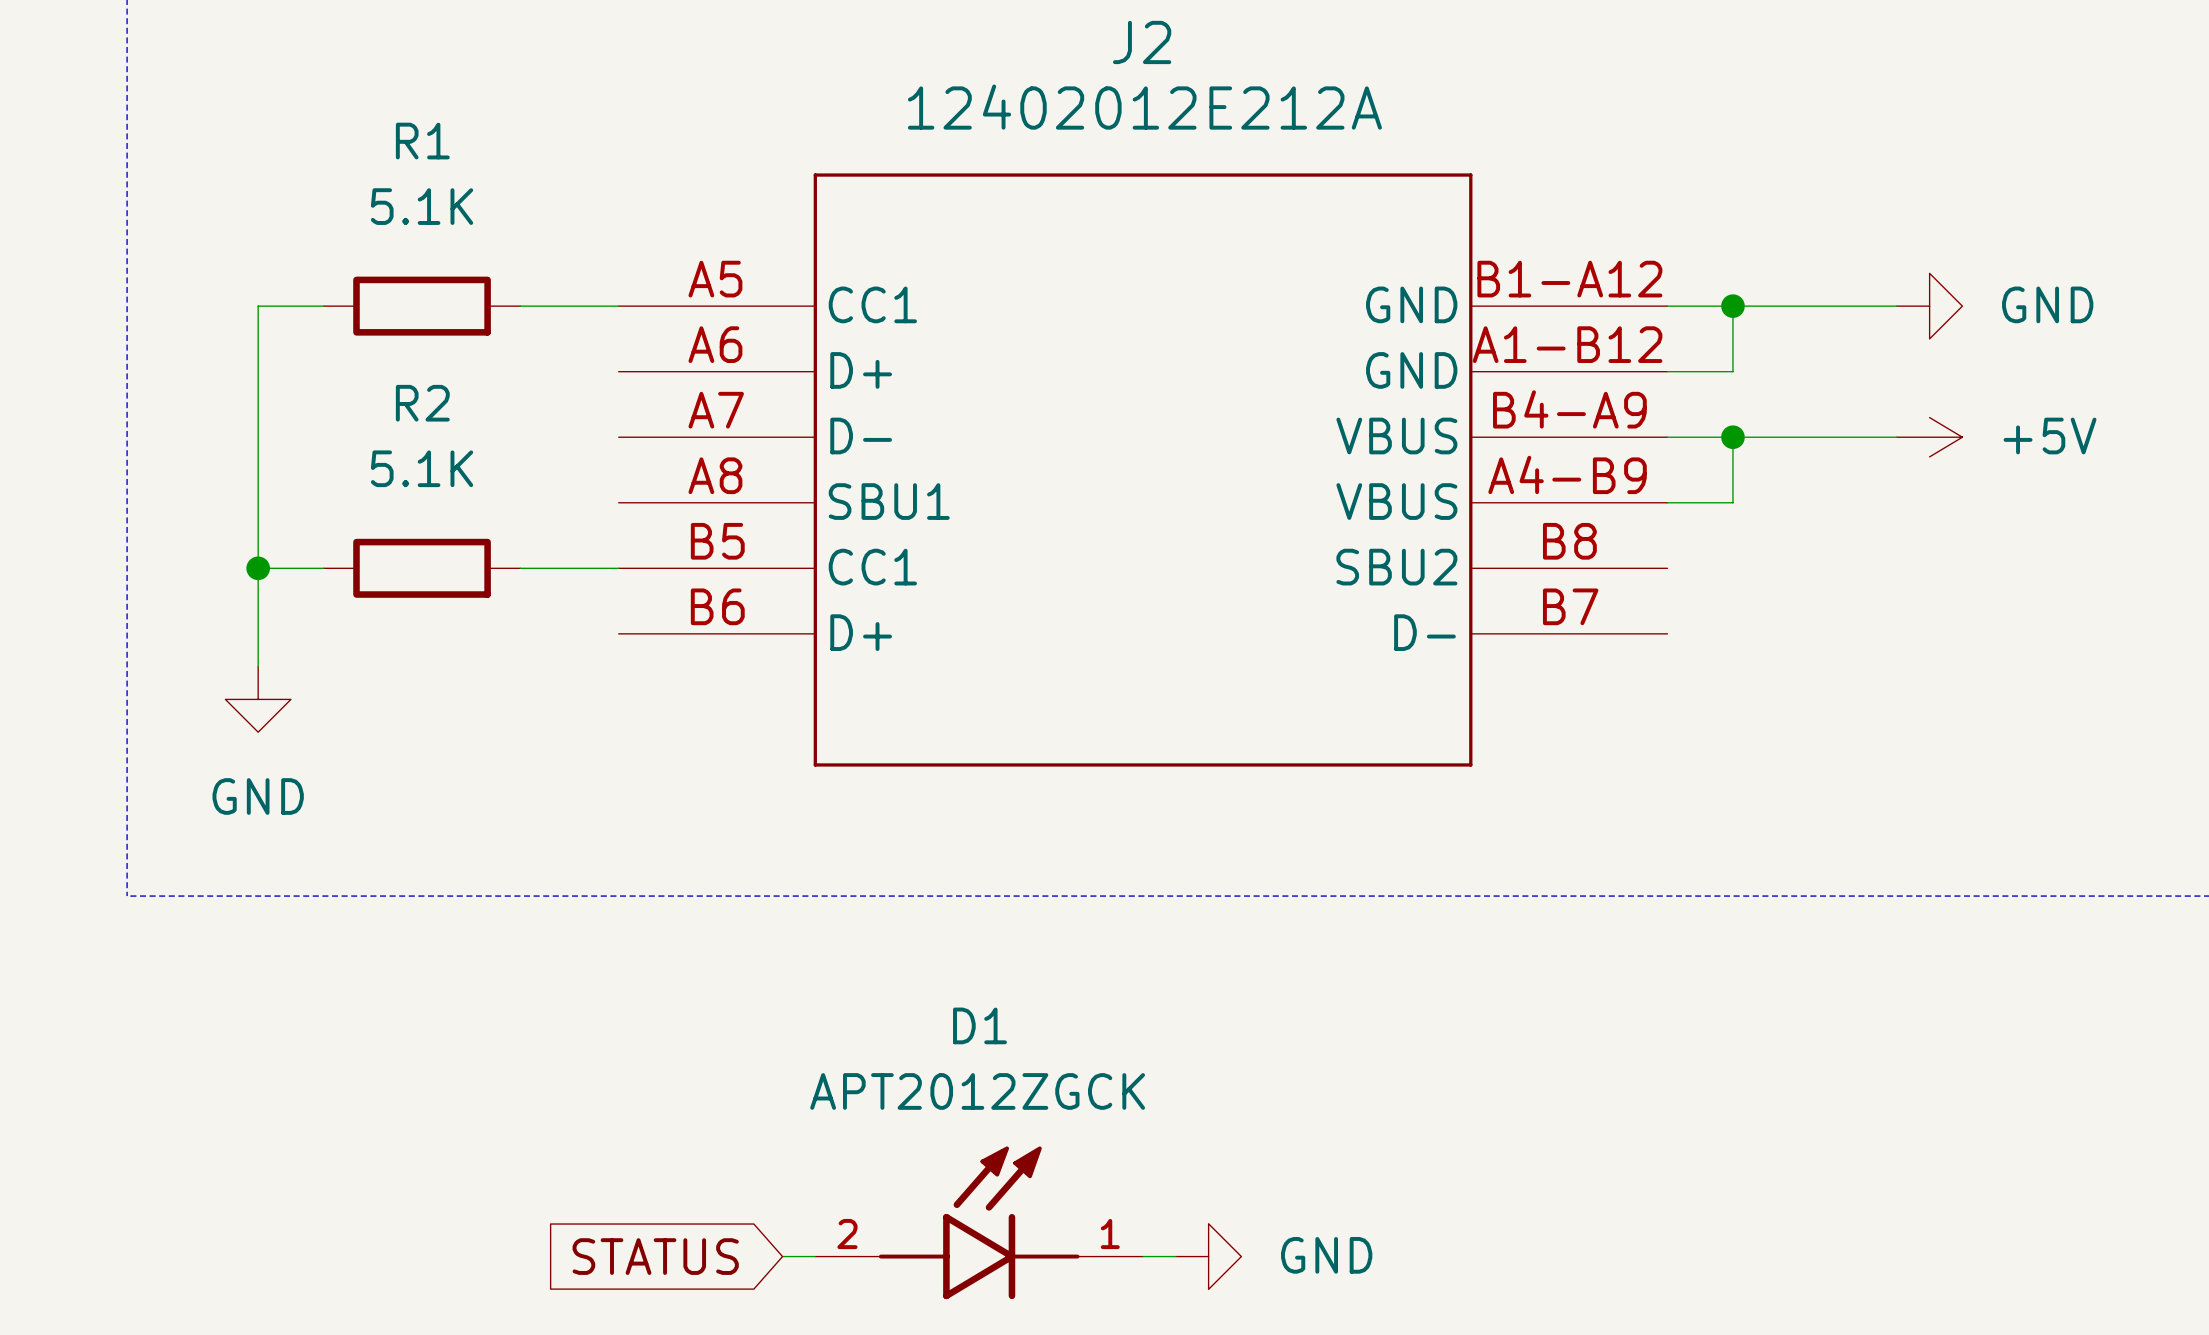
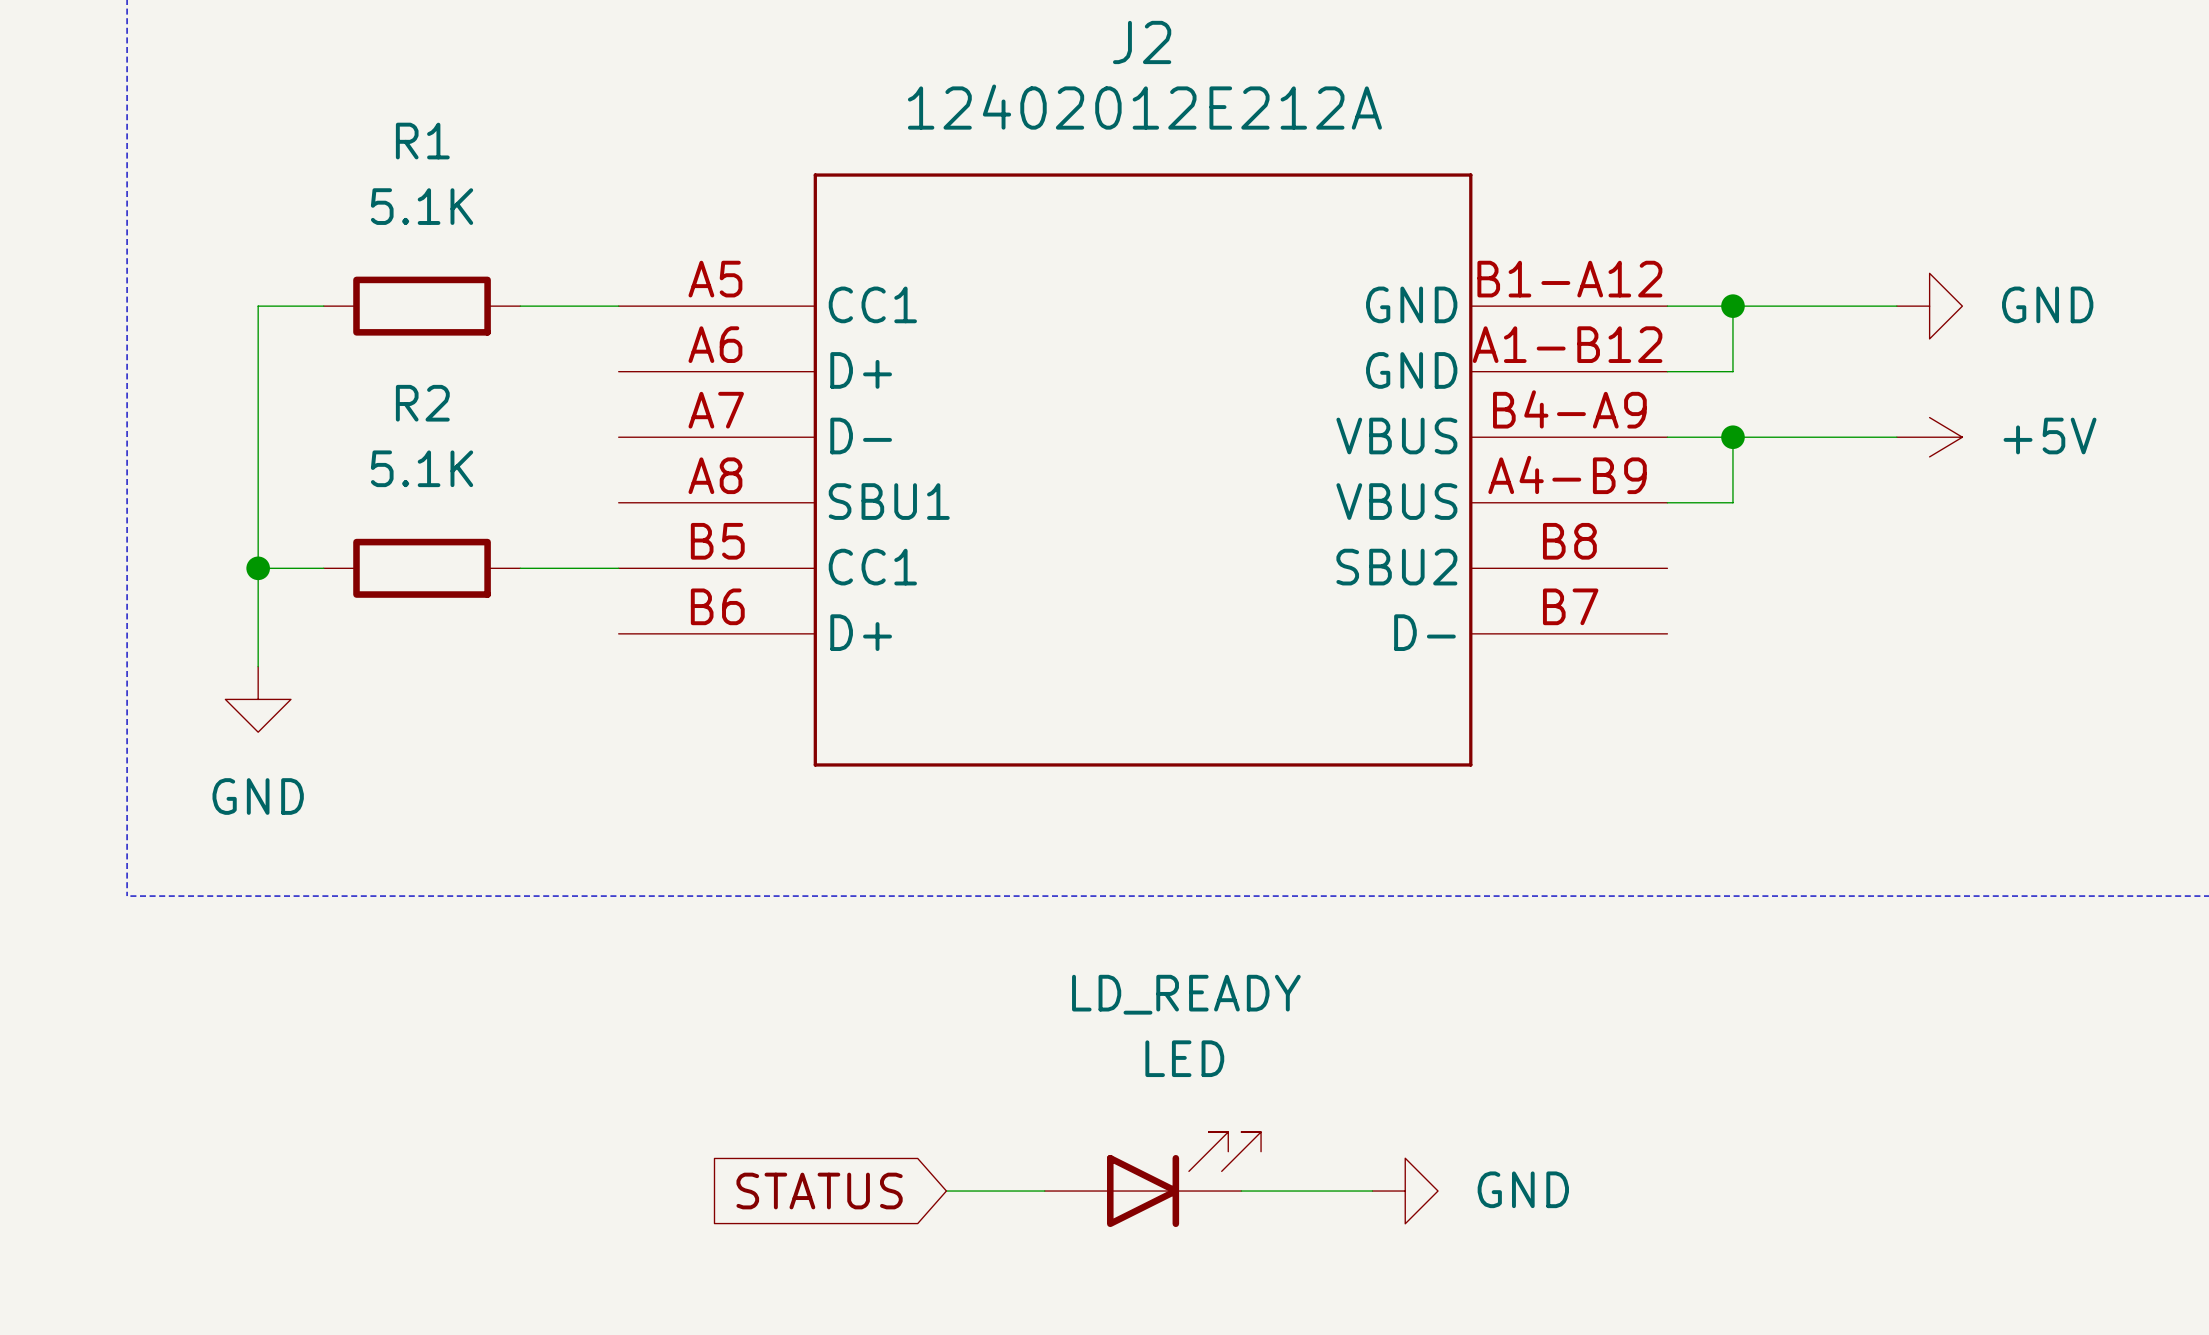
LD_READY: none -> LED (1152, 1179)
wire: none -> (946, 1191) (1044, 1191)
wire: none -> (1241, 1191) (1372, 1191)
D1: APT2012ZGCK (979, 1222) -> none
global label position: STATUS (655, 1256) -> STATUS (819, 1191)
wire: (782, 1256) (815, 1256) -> none
wire: (1143, 1256) (1175, 1256) -> none
power symbol position: GND (1208, 1256) -> GND (1405, 1191)

